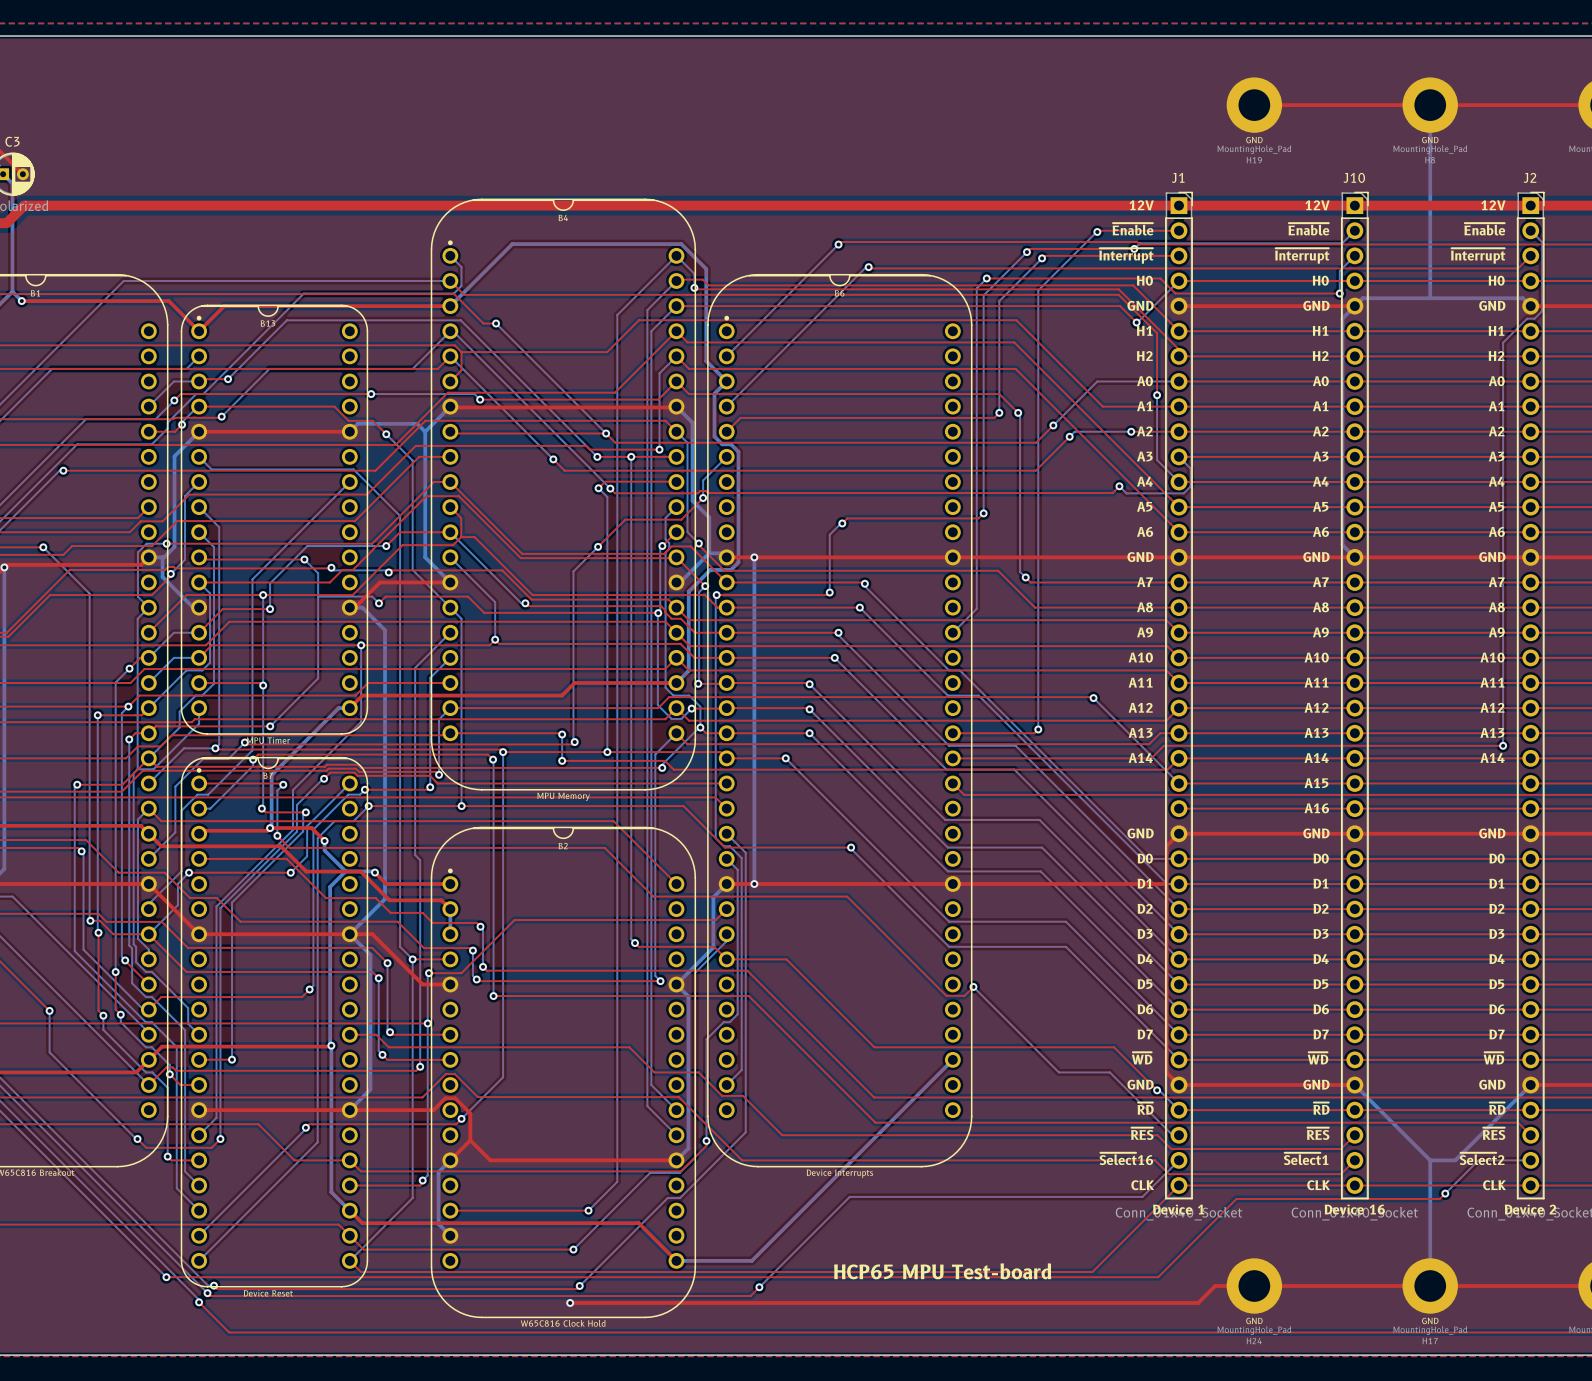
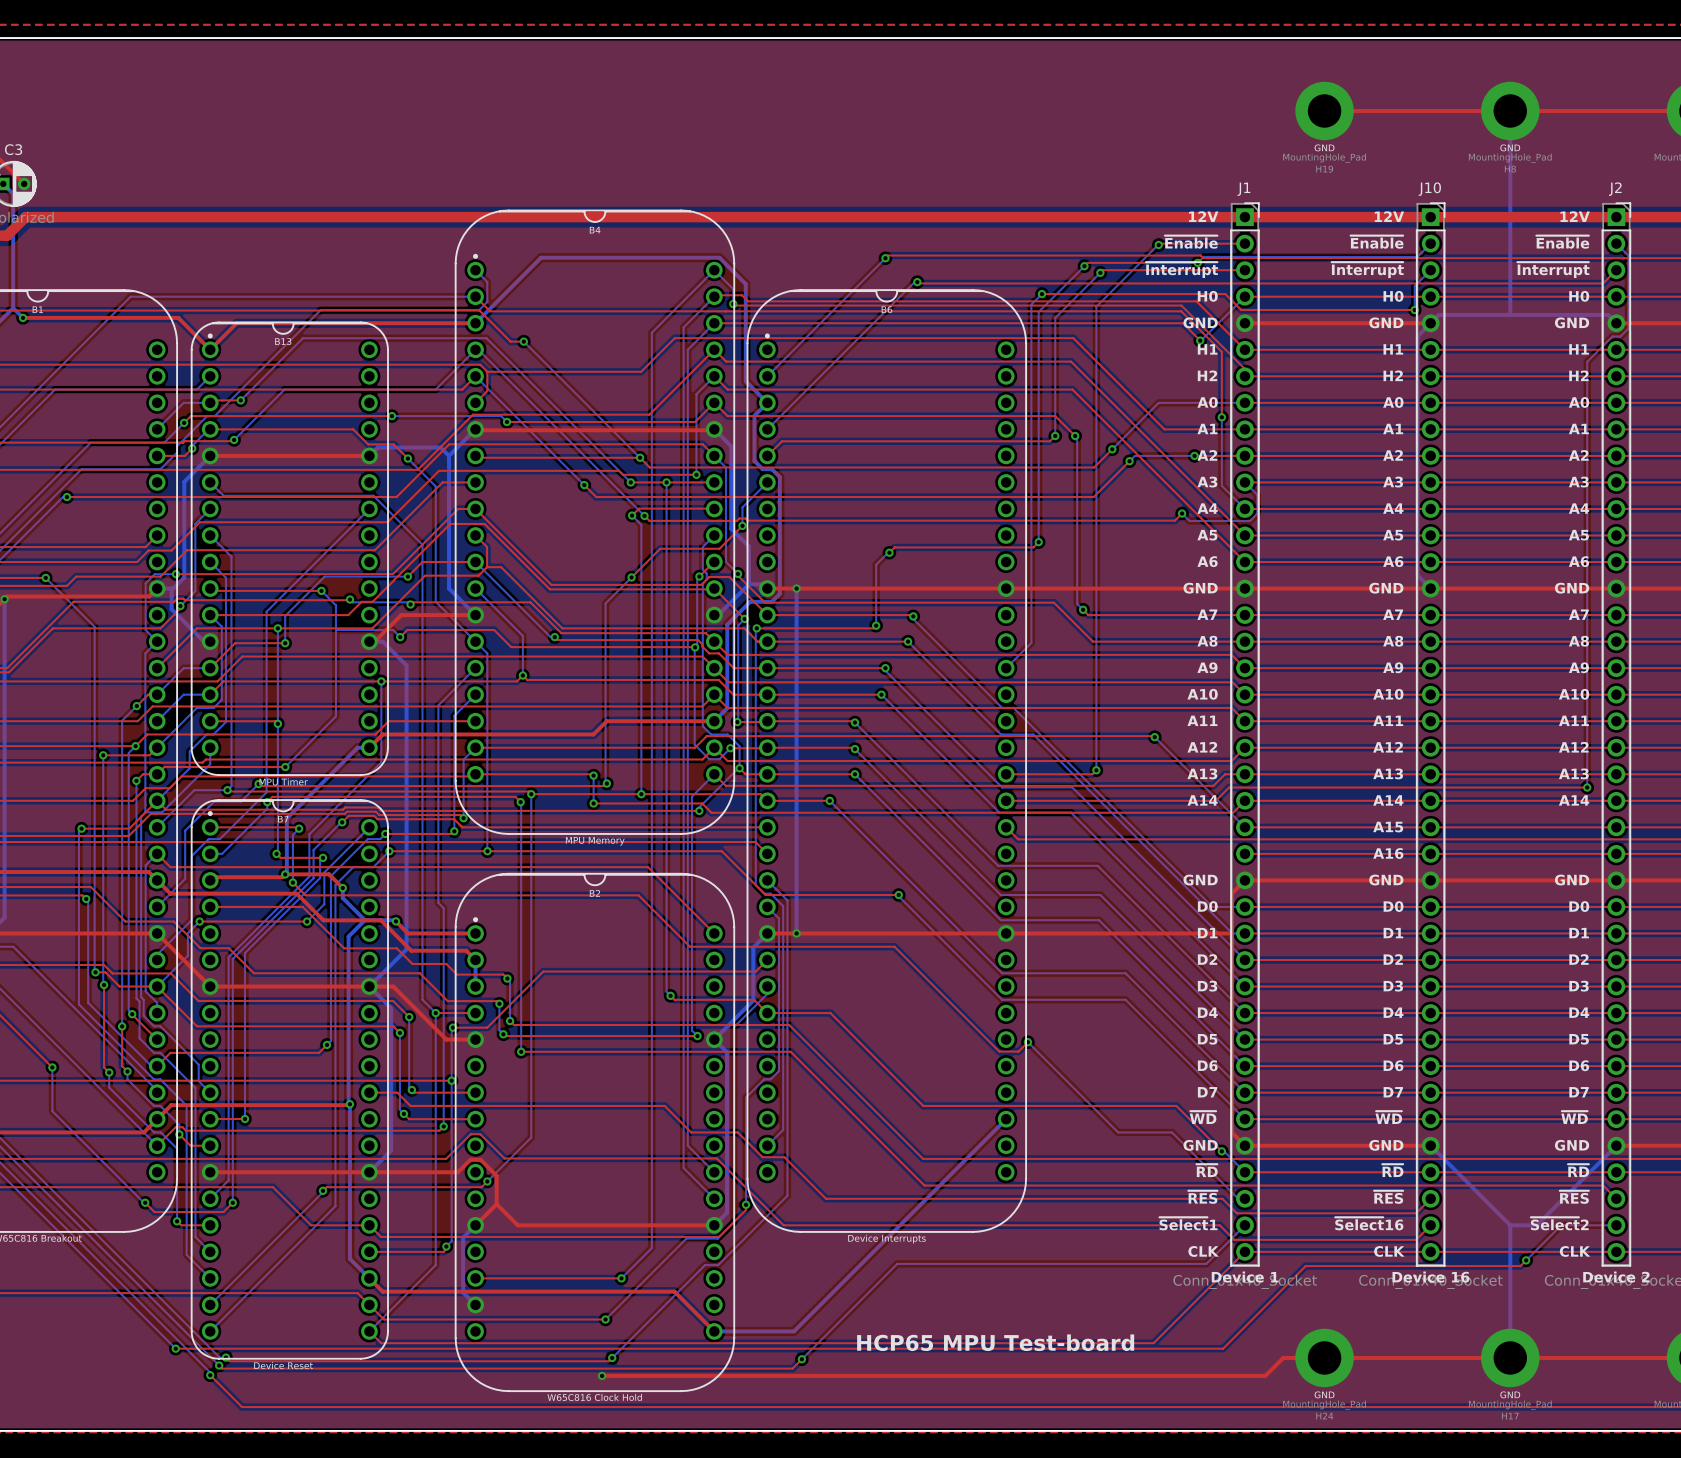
text: ~{Select}16 (1126, 1158) -> ~{Select}1 (1188, 1223)
text: ~{Select}1 (1306, 1158) -> ~{Select}16 (1369, 1223)

